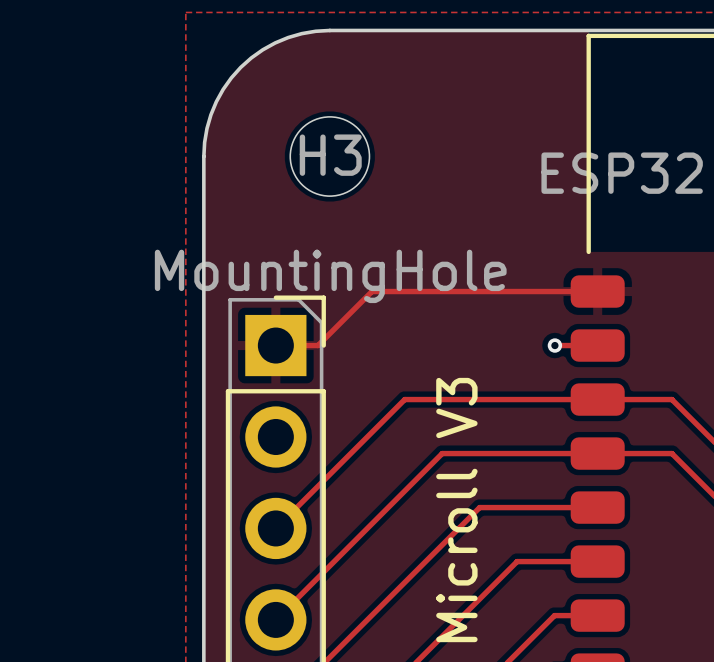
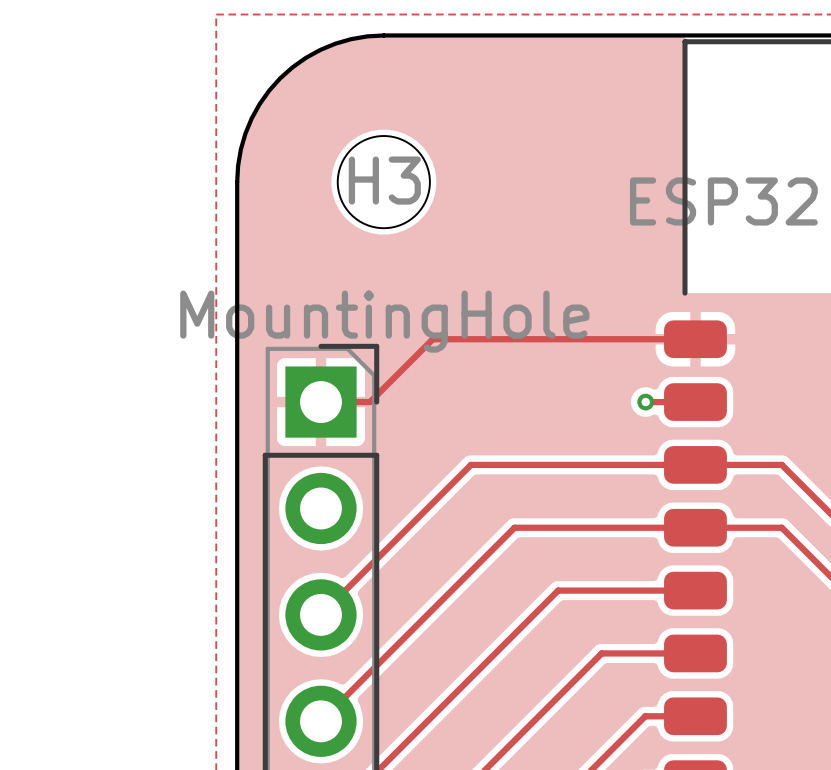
text: Microll V3 (456, 510) -> none

